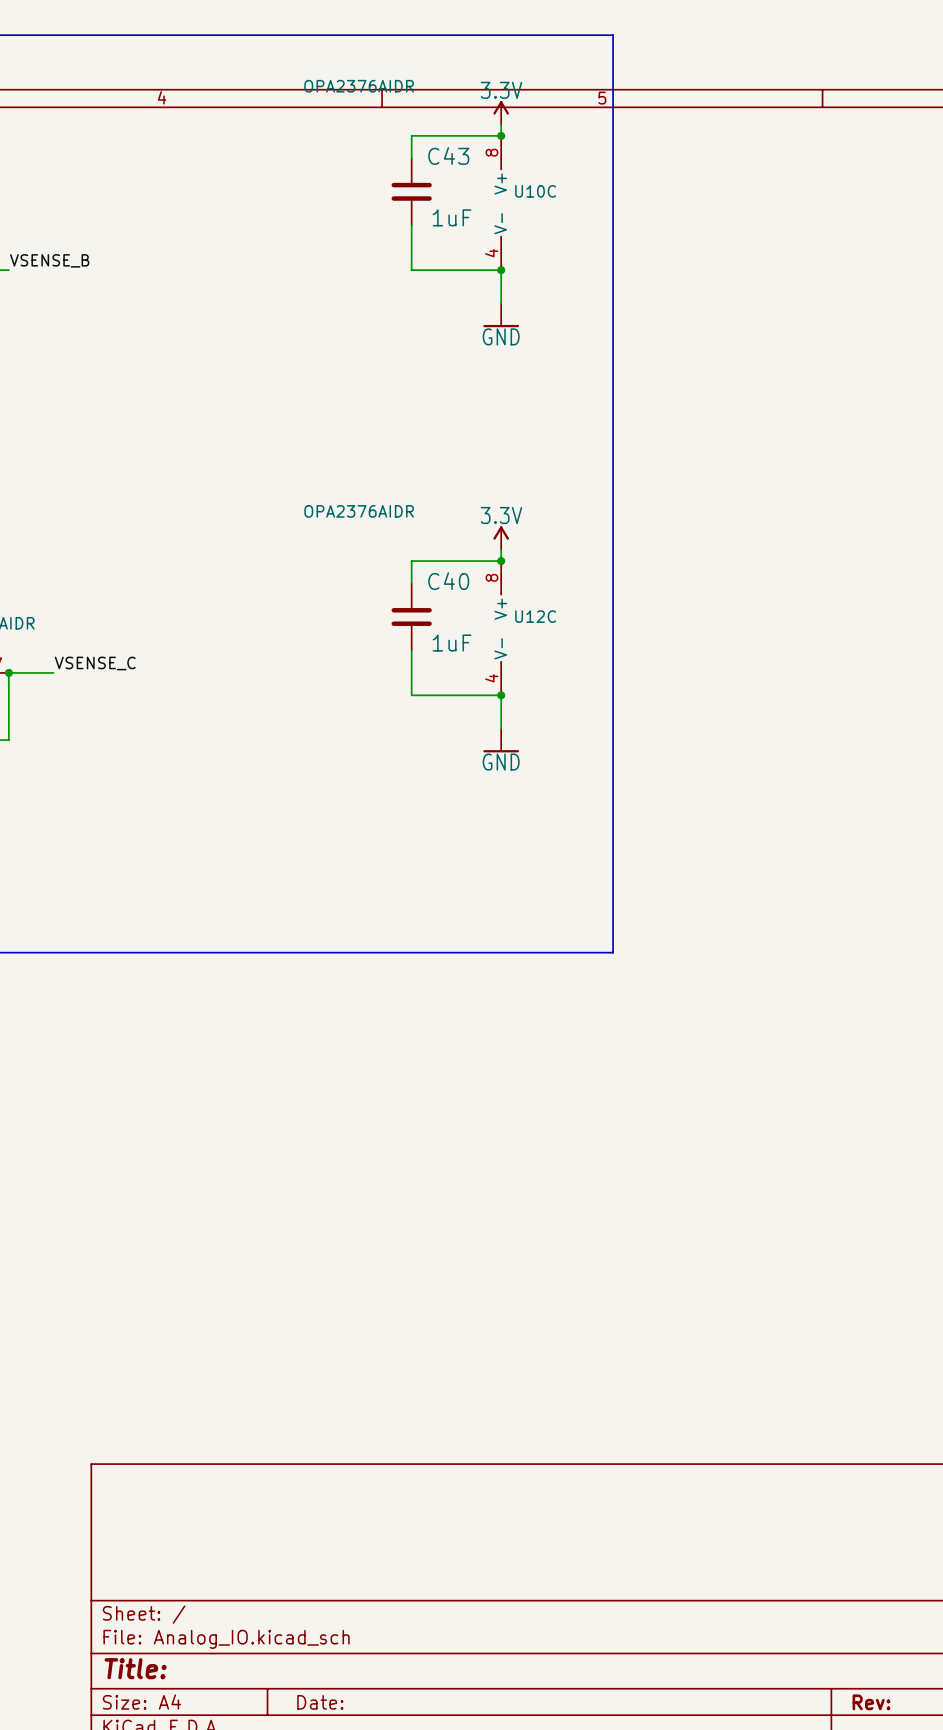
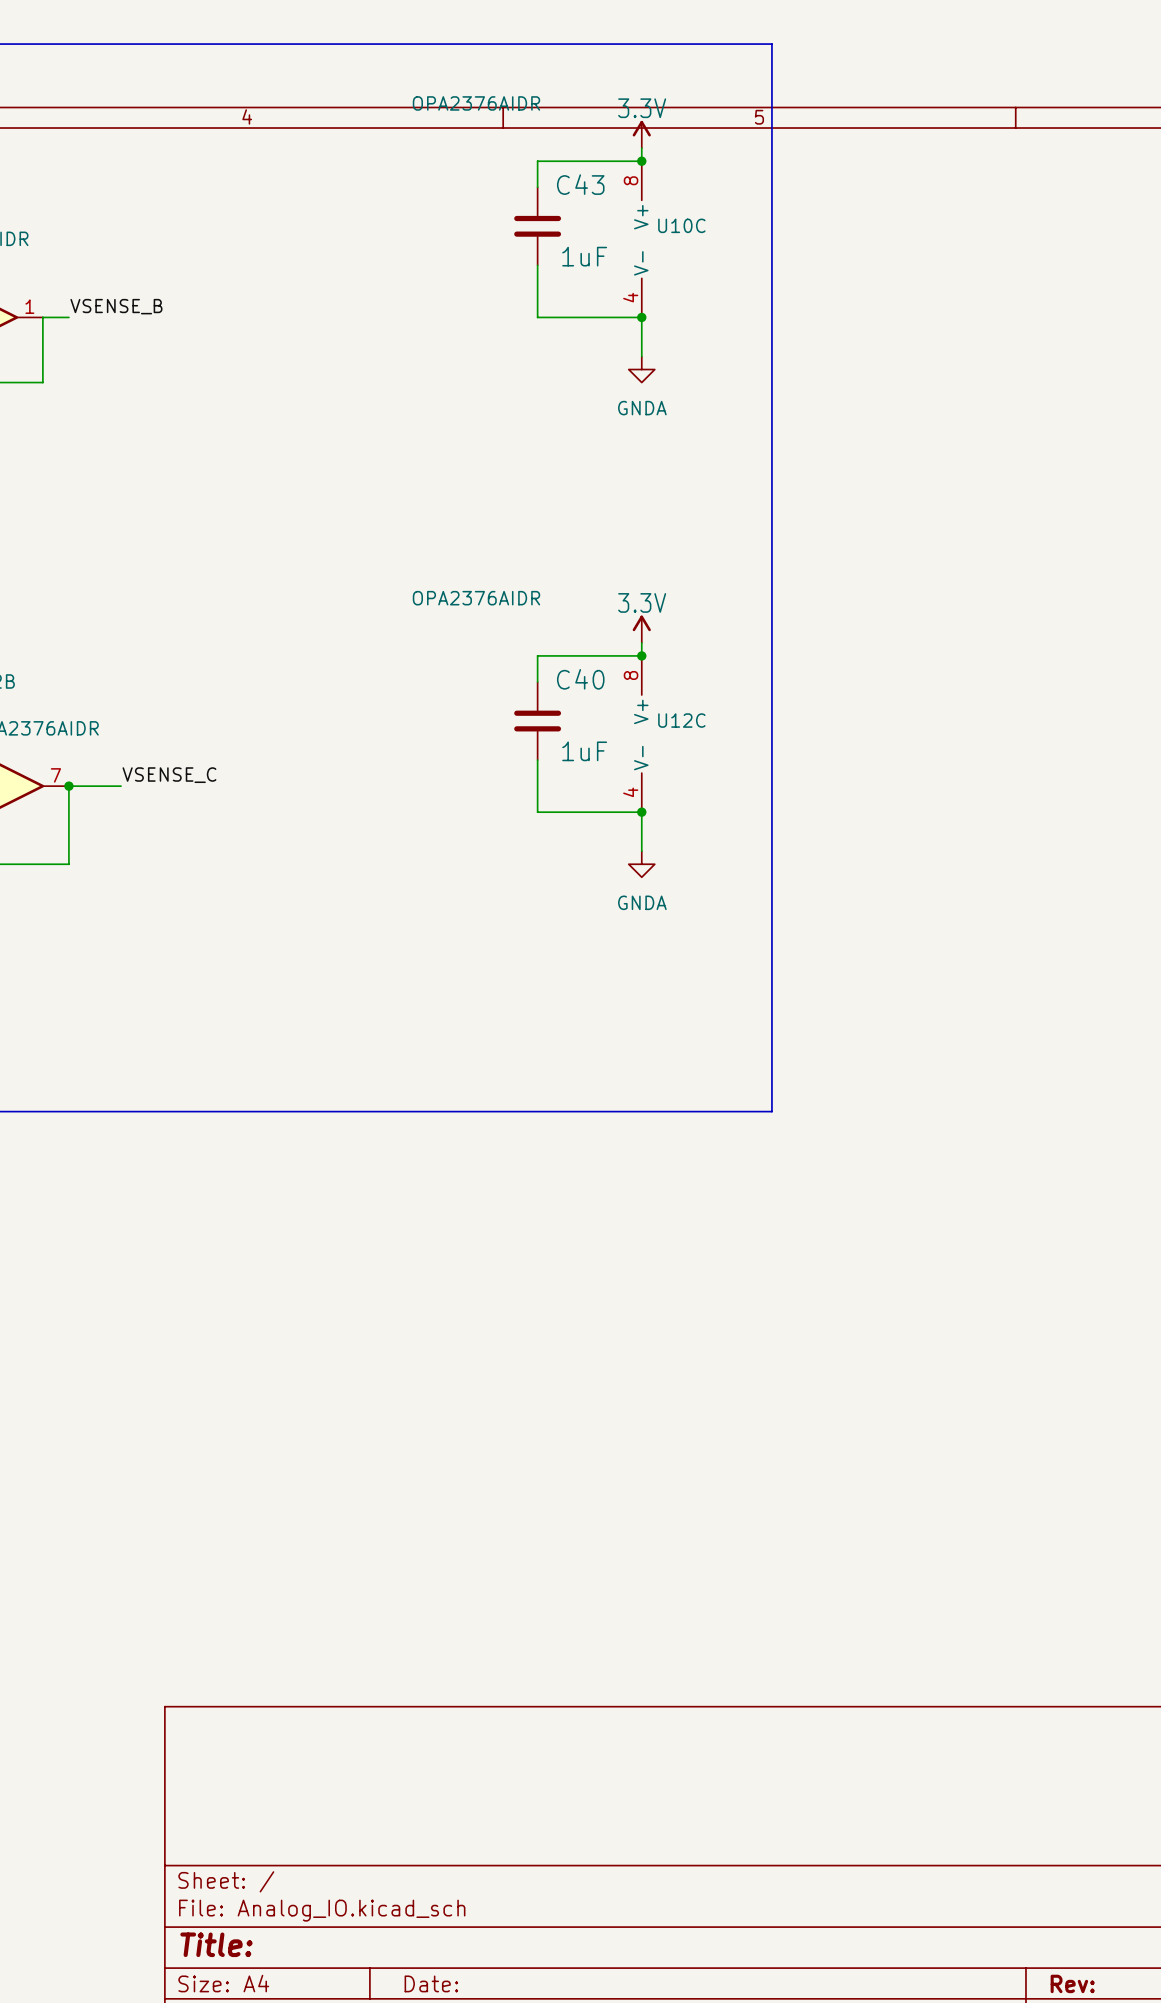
power symbol: GND (501, 315) -> GNDA (641, 369)
power symbol: GND (501, 740) -> GNDA (641, 864)

